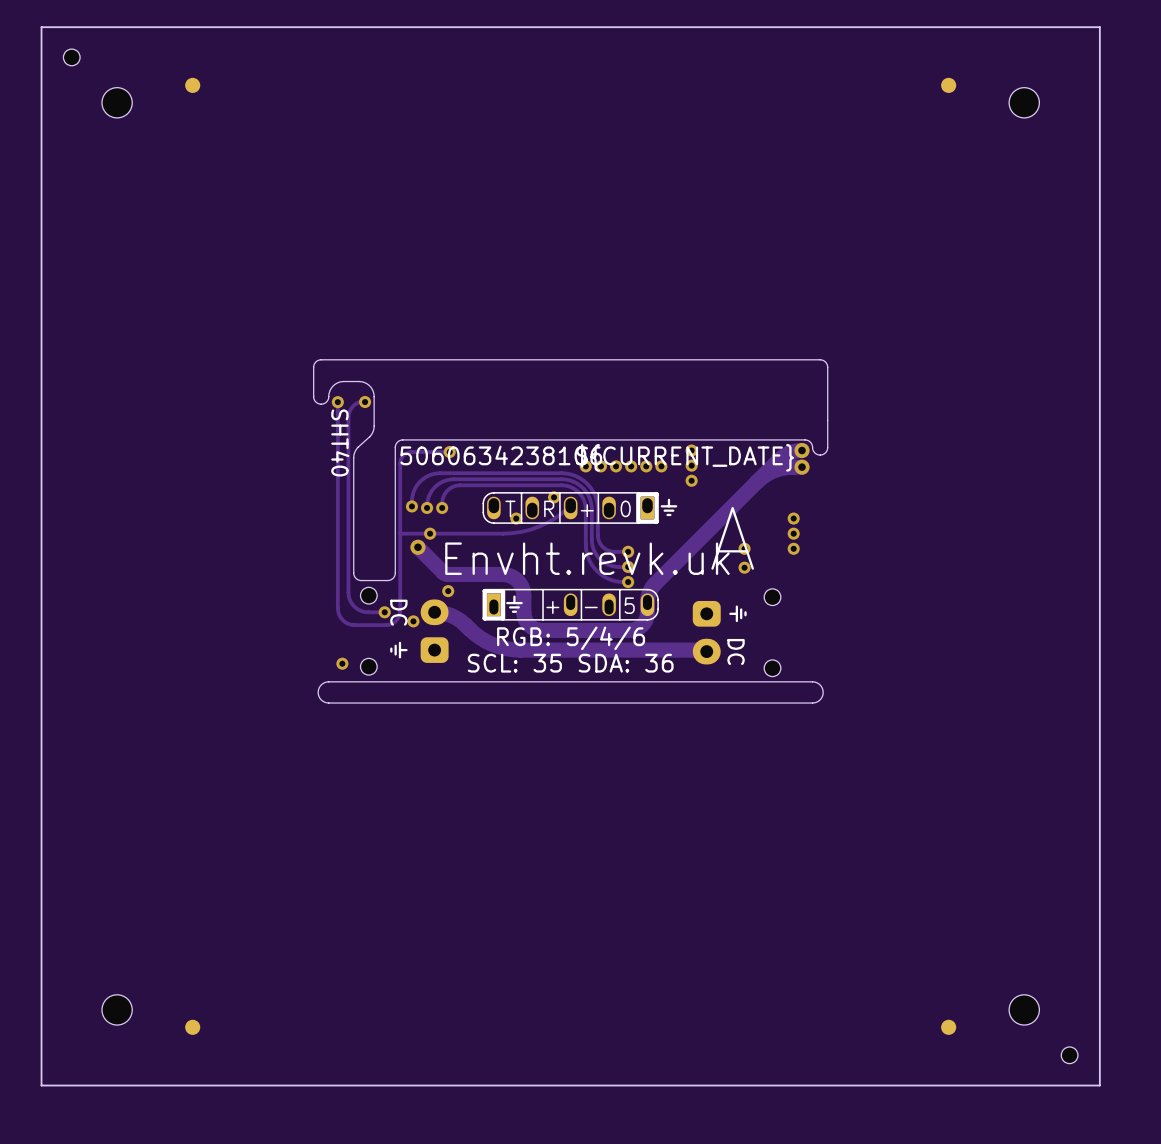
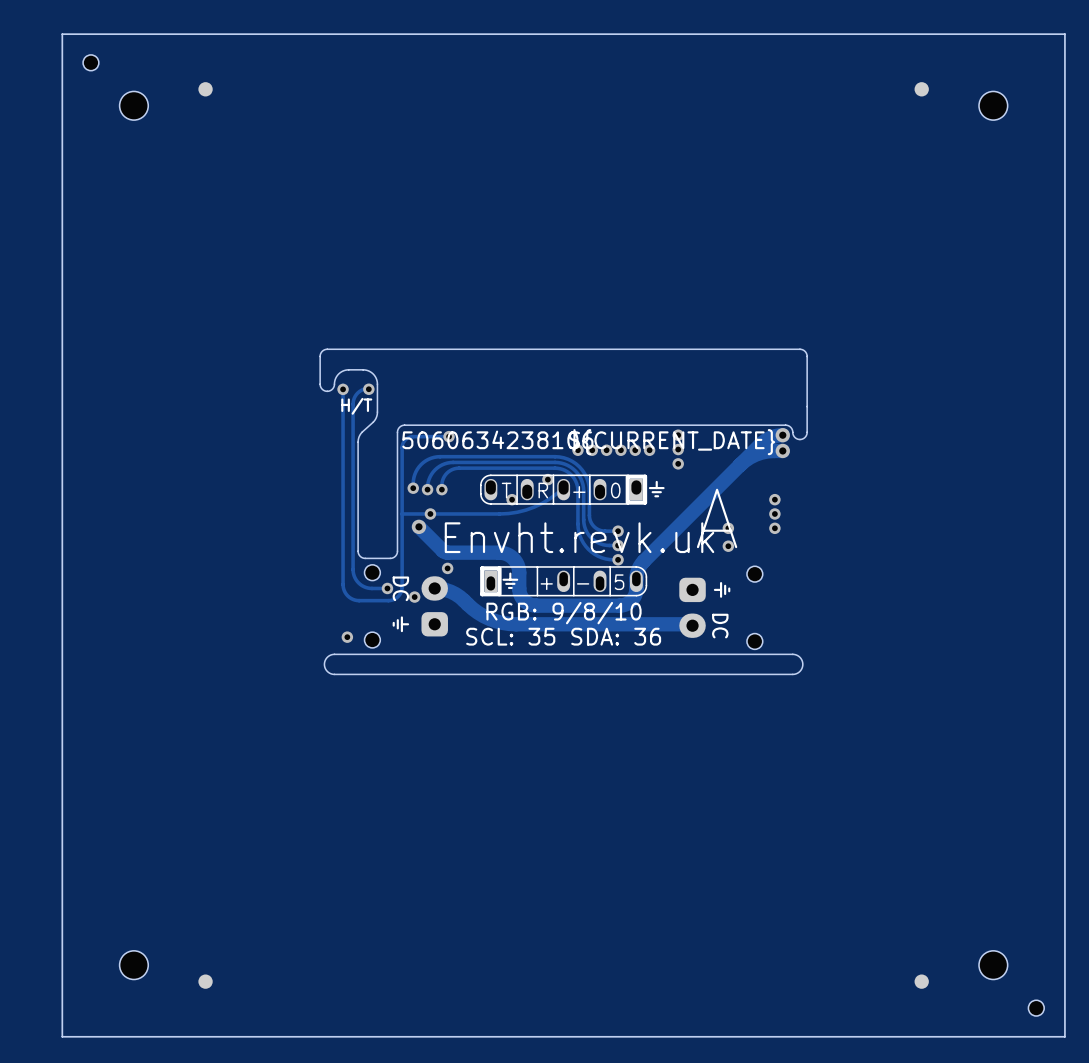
text: none -> H/T (356, 406)
text: SHT40 (340, 442) -> none
text: RGB: 5/4/6 (571, 638) -> RGB: 9/8/10 (564, 613)

